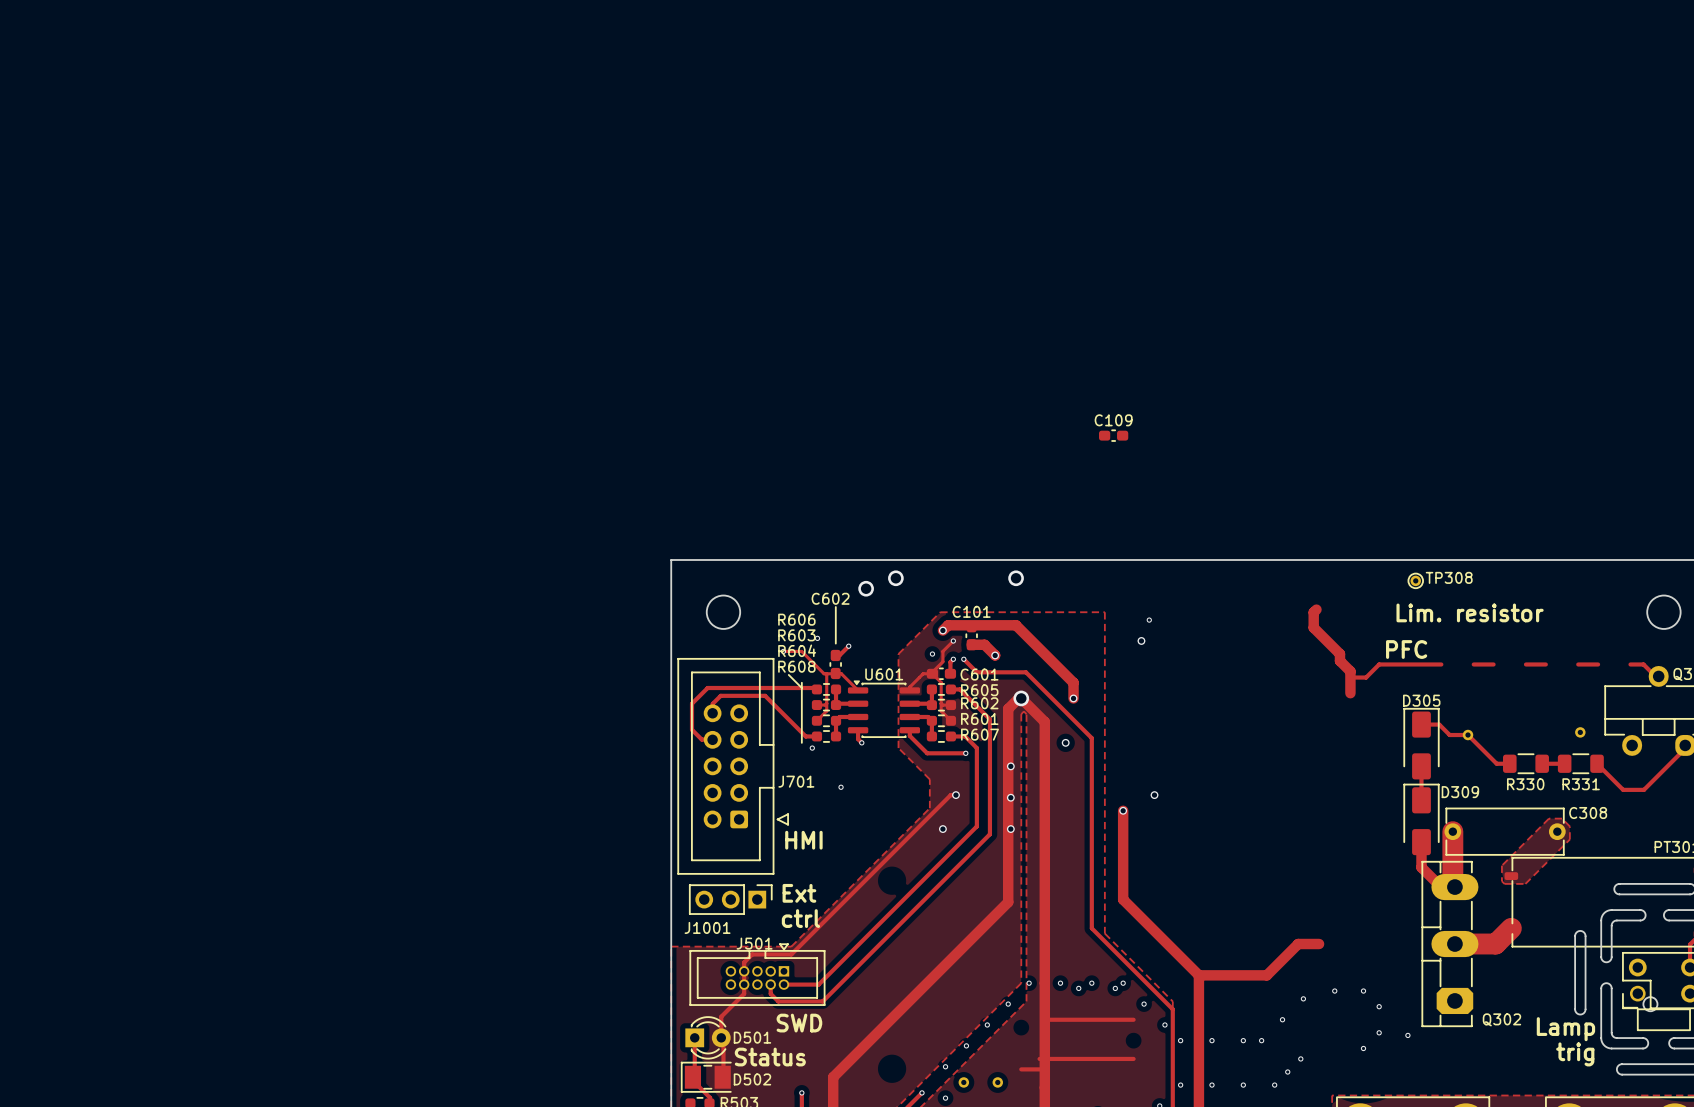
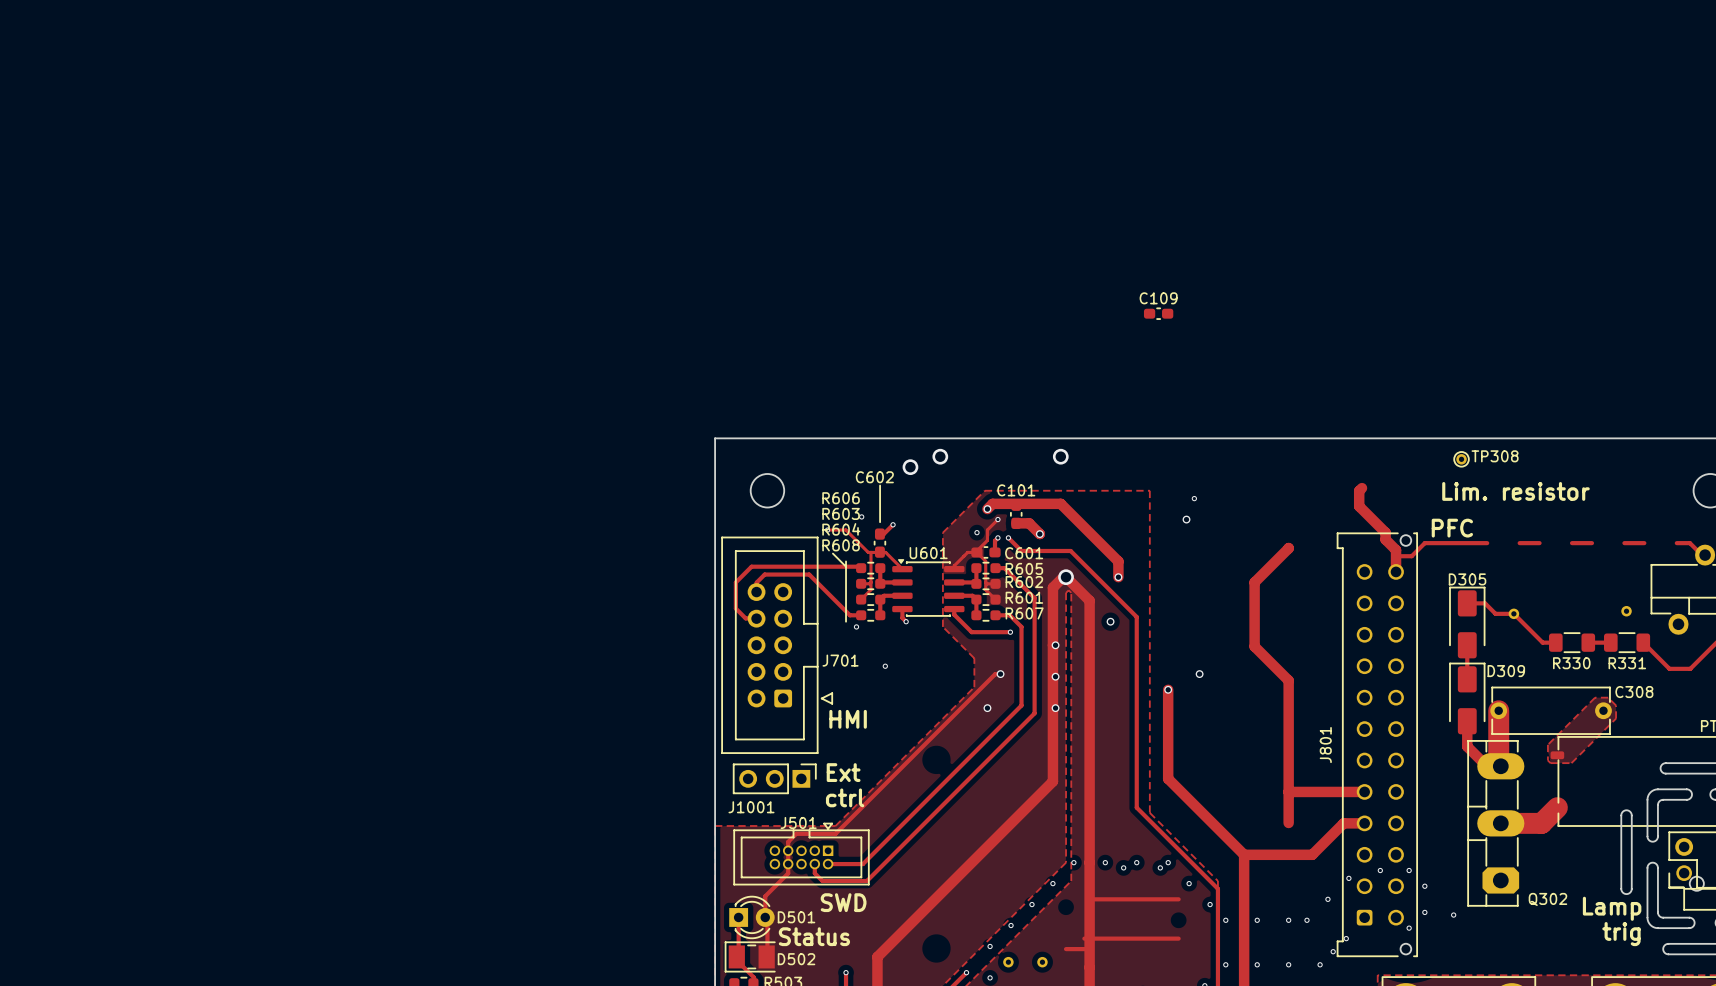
track: none -> (1288, 547) (1254, 582) (1254, 646) (1288, 680) (1288, 822)
J801: none -> (1377, 744)
track: none -> (1288, 791) (1364, 791)

